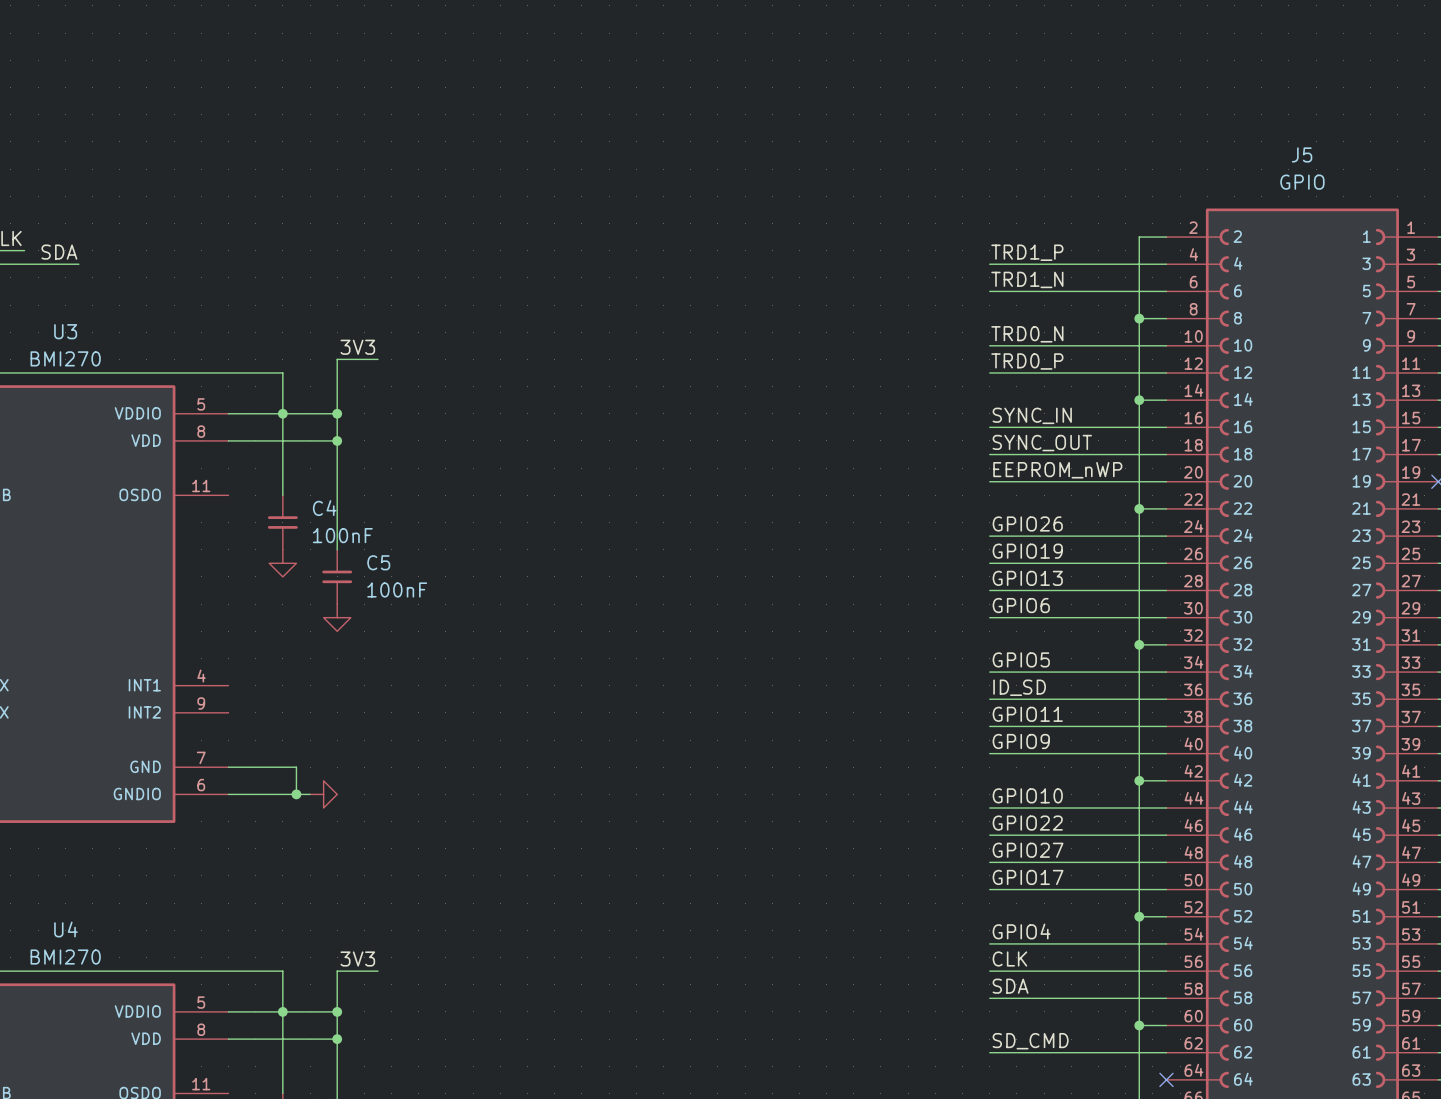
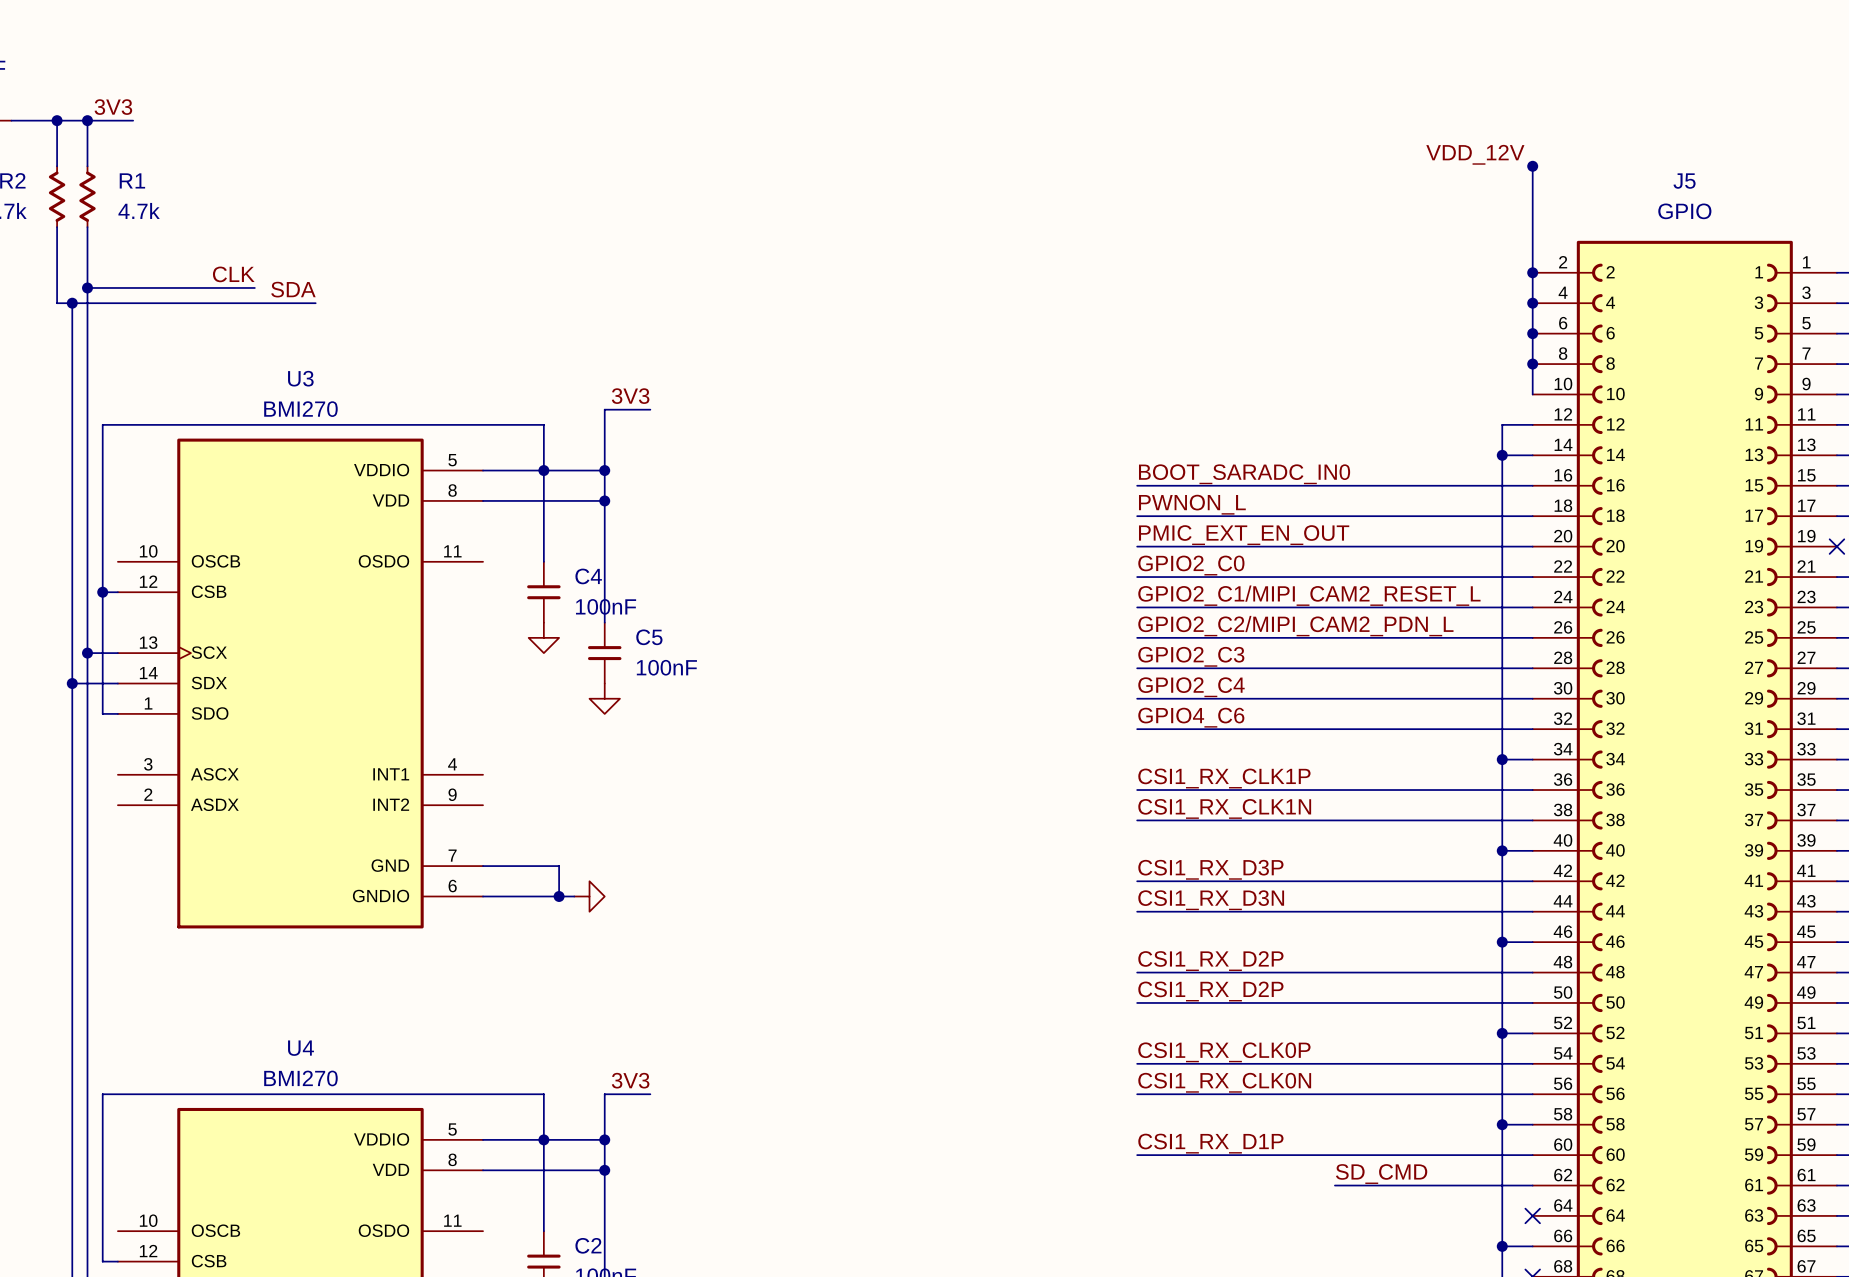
label: none -> VDD_12V (1475, 154)
junction: none -> (1532, 166)
wire: (1166, 237) (1139, 237) (1139, 372) (989, 372) -> none
junction: none -> (1532, 272)
label: TRD1_P (1027, 252) -> none
wire: (989, 264) (1166, 264) -> (1137, 516) (1334, 516)
junction: none -> (1532, 303)
label: TRD1_N (1027, 279) -> none
wire: (989, 291) (1166, 291) -> (1137, 546) (1334, 546)
junction: none -> (1532, 333)
wire: (1139, 318) (1166, 318) -> none
junction: (1139, 318) -> none
junction: none -> (1532, 364)
label: TRD0_N (1027, 334) -> none
wire: (989, 345) (1166, 345) -> (1532, 166) (1532, 394)
label: TRD0_P (1027, 361) -> none
label: none -> BOOT_SARADC_IN0 (1244, 474)
label: SYNC_IN (1032, 415) -> none
wire: none -> (1137, 485) (1334, 485)
label: none -> PWNON_L (1192, 504)
label: SYNC_OUT (1042, 443) -> none
label: none -> PMIC_EXT_EN_OUT (1244, 535)
label: EEPROM_nWP (1057, 470) -> none
label: none -> GPIO2_C0 (1191, 565)
wire: none -> (1137, 577) (1502, 577)
junction: (1139, 508) -> none
label: GPIO26 (1027, 523) -> none
label: none -> GPIO2_C1/MIPI_CAM2_RESET_L (1309, 595)
wire: none -> (1137, 607) (1334, 607)
label: GPIO19 (1027, 551) -> none
label: none -> GPIO2_C2/MIPI_CAM2_PDN_L (1295, 626)
wire: none -> (1137, 637) (1334, 637)
label: GPIO13 (1027, 578) -> none
label: none -> GPIO2_C3 (1191, 656)
wire: none -> (1137, 668) (1334, 668)
label: none -> GPIO2_C4 (1191, 687)
label: GPIO6 (1021, 605) -> none
wire: none -> (1137, 698) (1334, 698)
label: none -> GPIO4_C6 (1191, 717)
wire: none -> (1137, 729) (1502, 729)
junction position: (1139, 644) -> (1502, 759)
label: GPIO5 (1021, 659) -> none
wire: (989, 672) (1139, 672) -> none
label: none -> CSI1_RX_CLK1P (1224, 778)
label: ID_SD (1019, 687) -> none
wire: none -> (1137, 790) (1334, 790)
label: none -> CSI1_RX_CLK1N (1224, 808)
label: GPIO11 (1027, 714) -> none
wire: none -> (1137, 820) (1334, 820)
label: GPIO9 (1021, 741) -> none
wire: (989, 753) (1139, 753) -> none
junction: none -> (1502, 850)
label: none -> CSI1_RX_D3P (1210, 869)
wire: none -> (1137, 881) (1502, 881)
junction: (1139, 780) -> none
label: GPIO10 (1027, 795) -> none
label: none -> CSI1_RX_D3N (1211, 900)
wire: none -> (1137, 911) (1334, 911)
label: GPIO22 (1027, 823) -> none
wire: (989, 835) (1139, 835) -> none
junction: none -> (1502, 942)
label: none -> CSI1_RX_D2P (1210, 961)
label: GPIO27 (1028, 850) -> none
wire: none -> (1137, 972) (1334, 972)
label: GPIO17 (1028, 877) -> none
label: none -> CSI1_RX_D2P (1210, 991)
wire: none -> (1137, 1002) (1334, 1002)
label: GPIO4 (1021, 931) -> none
label: none -> CSI1_RX_CLK0P (1224, 1052)
wire: none -> (1137, 1063) (1334, 1063)
label: none -> CSI1_RX_CLK0N (1224, 1082)
label: CLK (1009, 959) -> none
wire: none -> (1137, 1094) (1334, 1094)
label: SDA (1010, 986) -> none
wire: (989, 998) (1139, 998) -> none
label: none -> CSI1_RX_D1P (1210, 1143)
wire: none -> (1137, 1155) (1502, 1155)
junction position: (1139, 1025) -> (1502, 1124)

